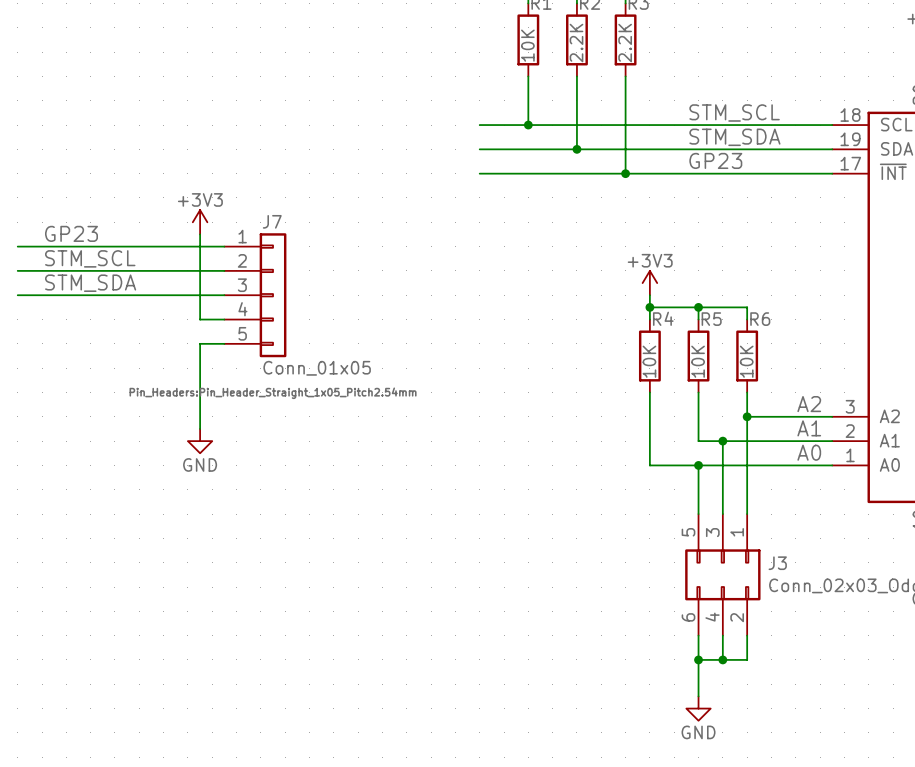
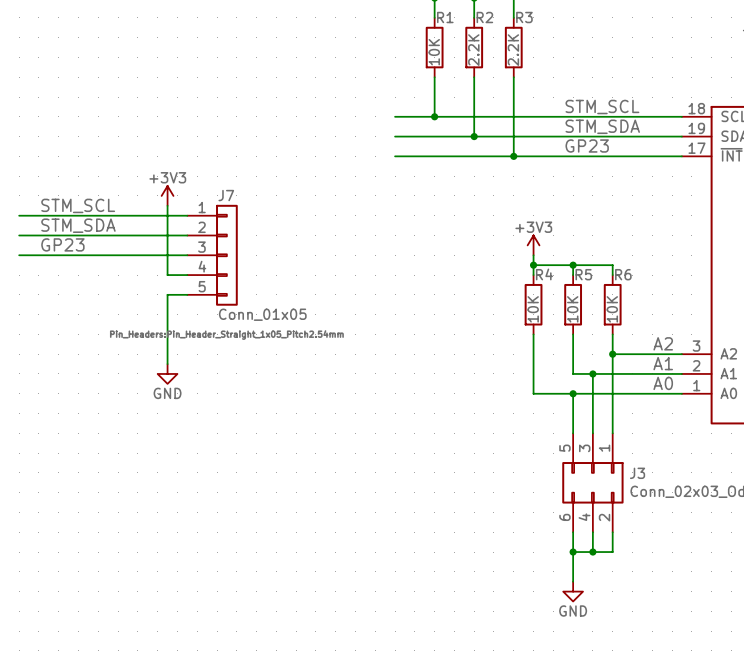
label: GP23 (71, 233) -> STM_SCL (78, 205)
label: STM_SCL (90, 258) -> STM_SDA (78, 225)
label: STM_SDA (90, 283) -> GP23 (62, 244)

